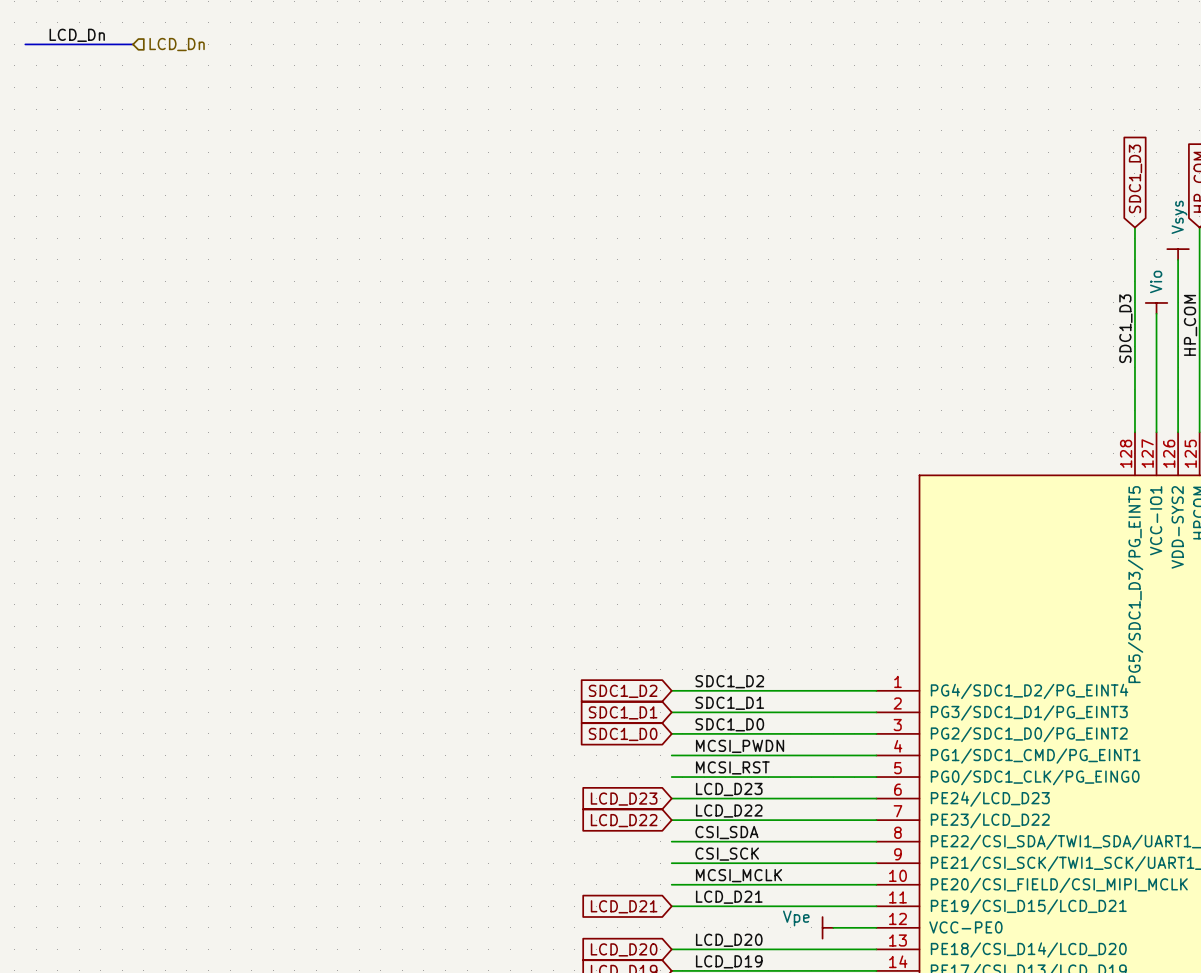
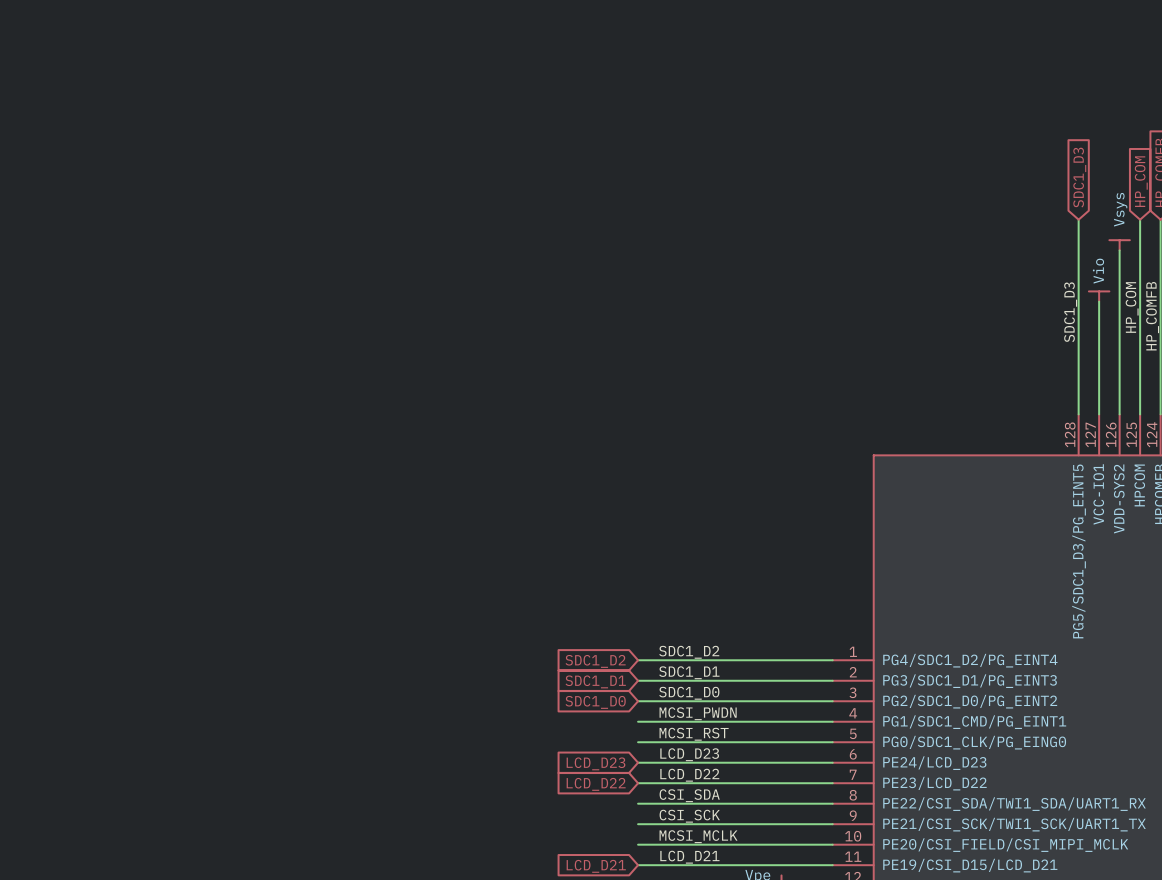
label: LCD_Dn (77, 35) -> none
bus: (25, 44) (133, 44) -> none
hierarchical label: LCD_Dn (177, 44) -> none

